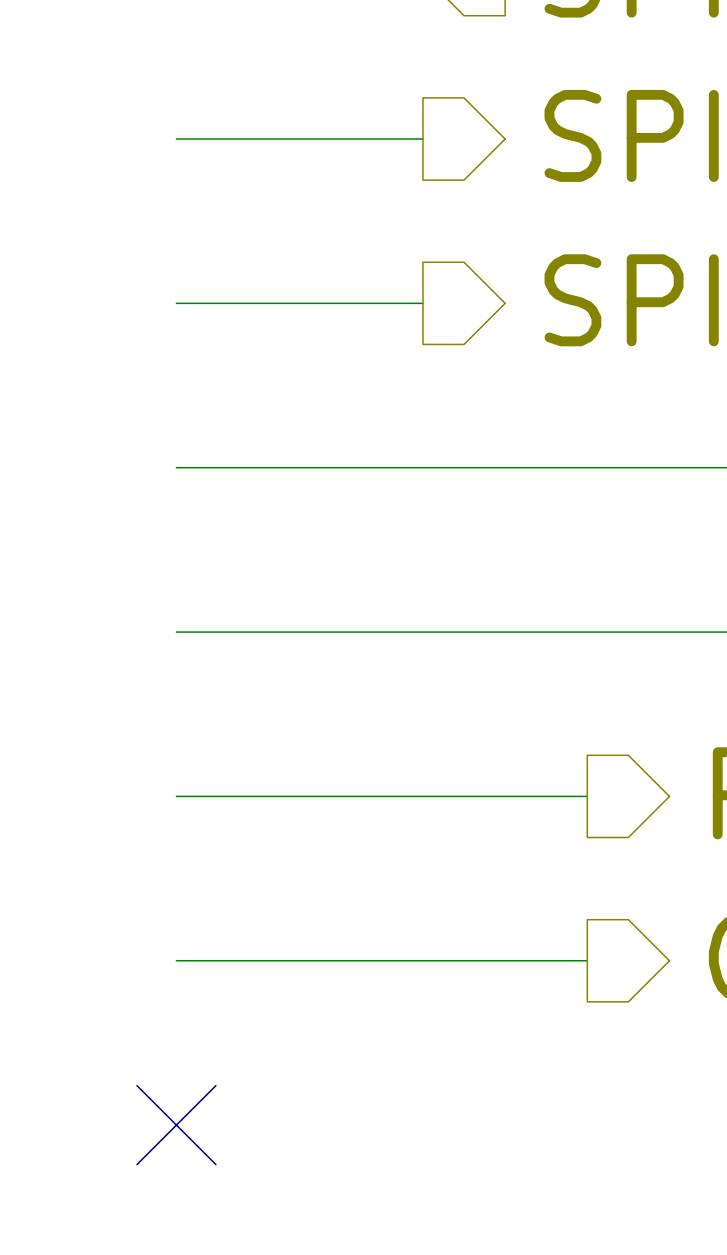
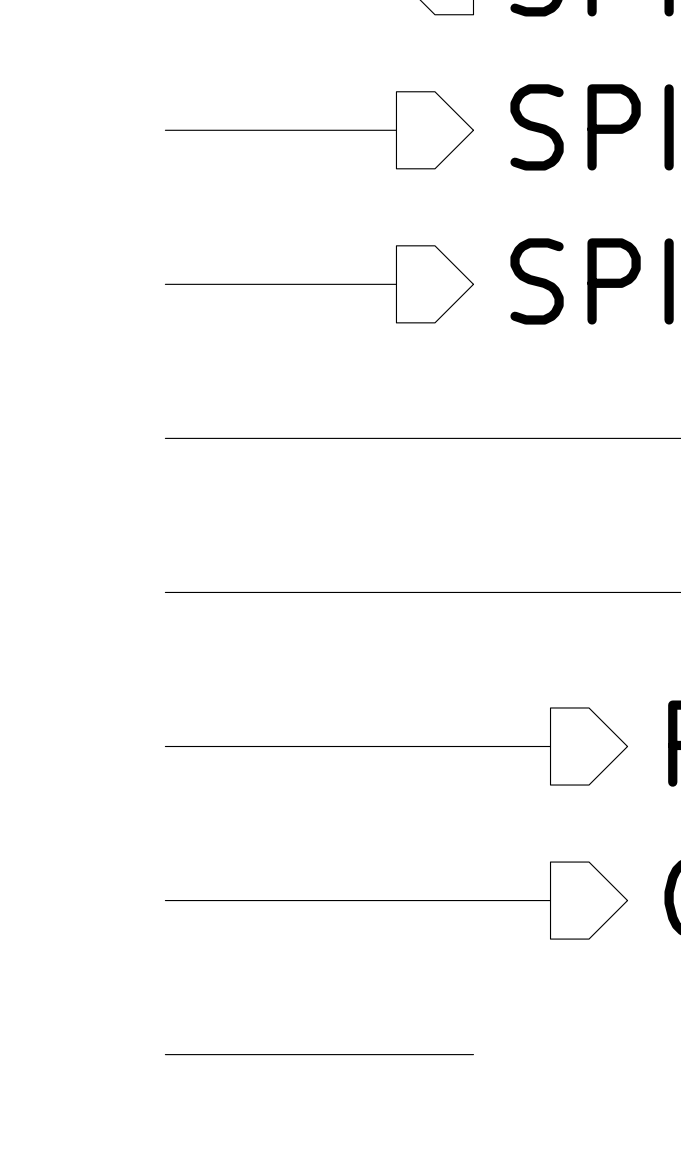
wire: none -> (165, 1054) (473, 1054)
no-connect mark: (176, 1125) -> none

